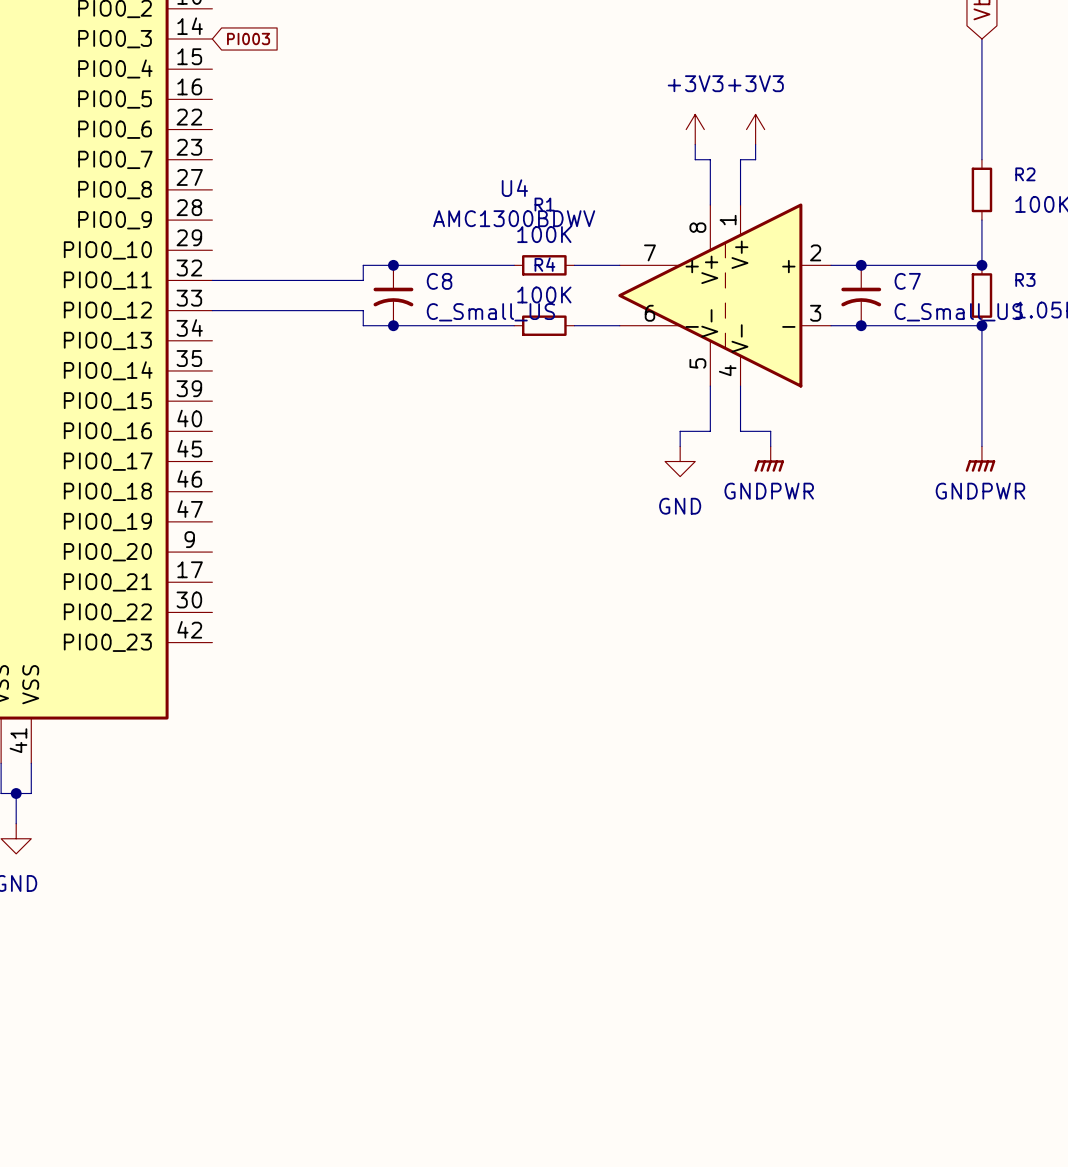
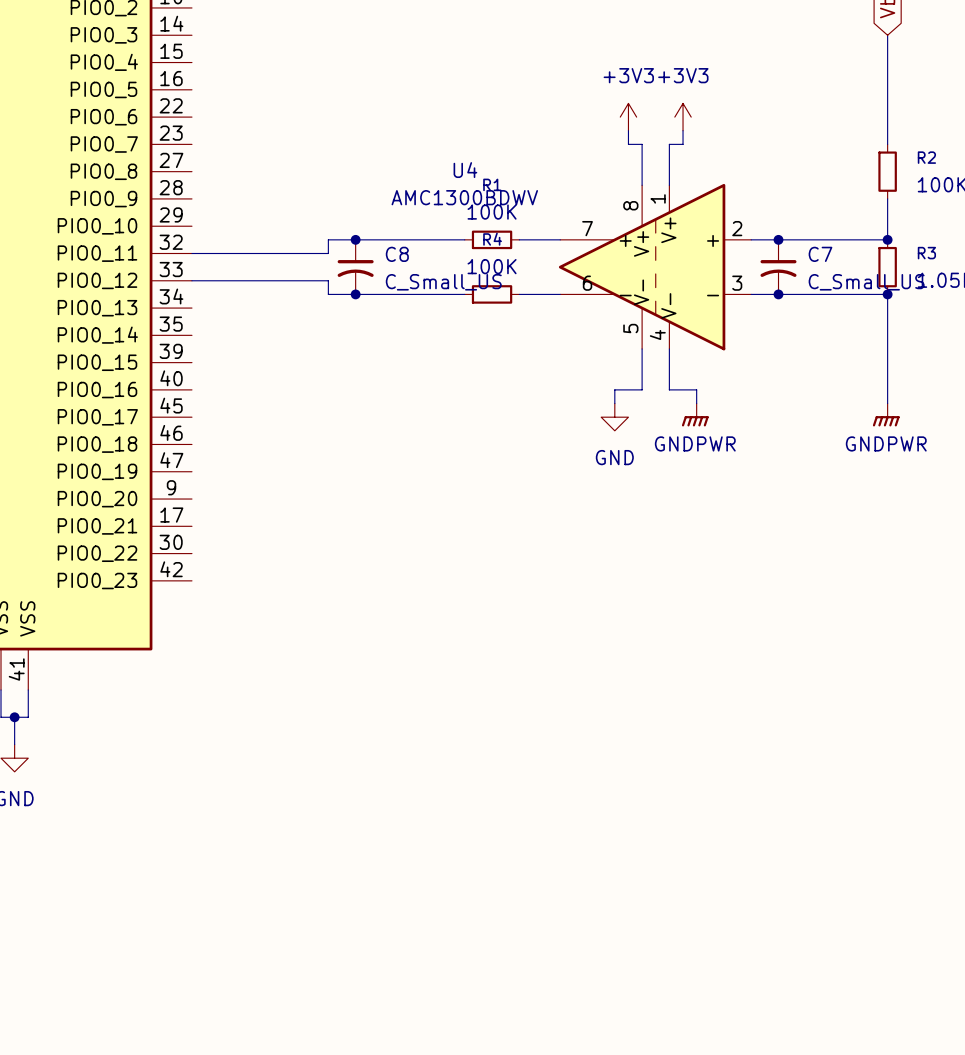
global label: PI003 (248, 39) -> none

